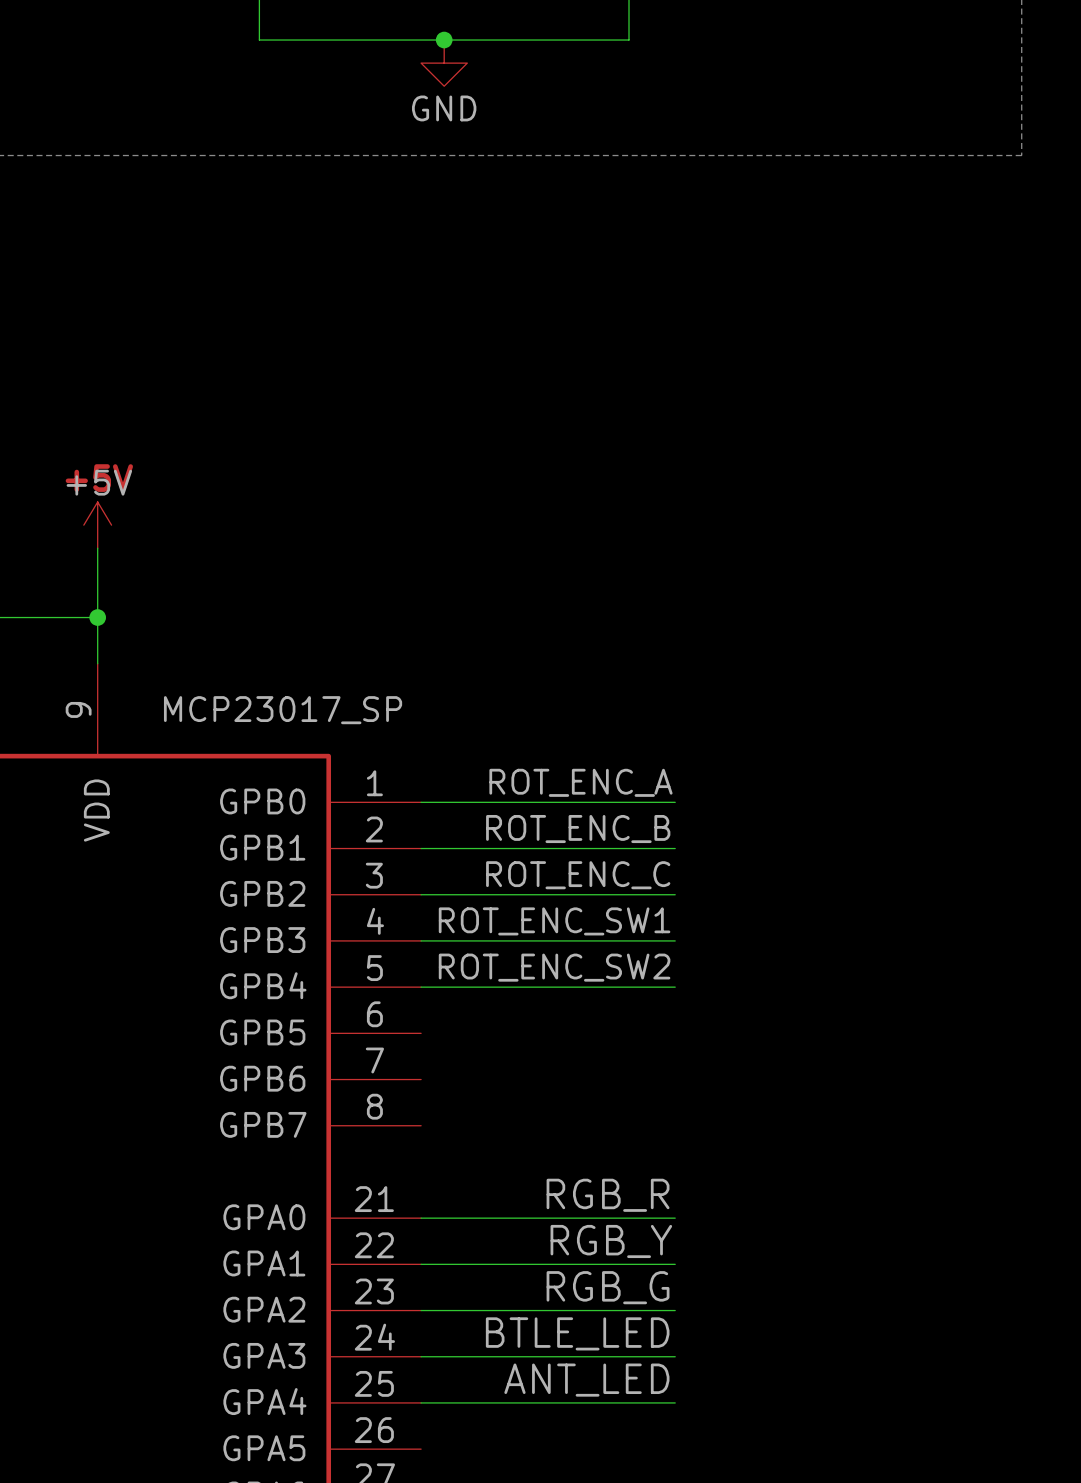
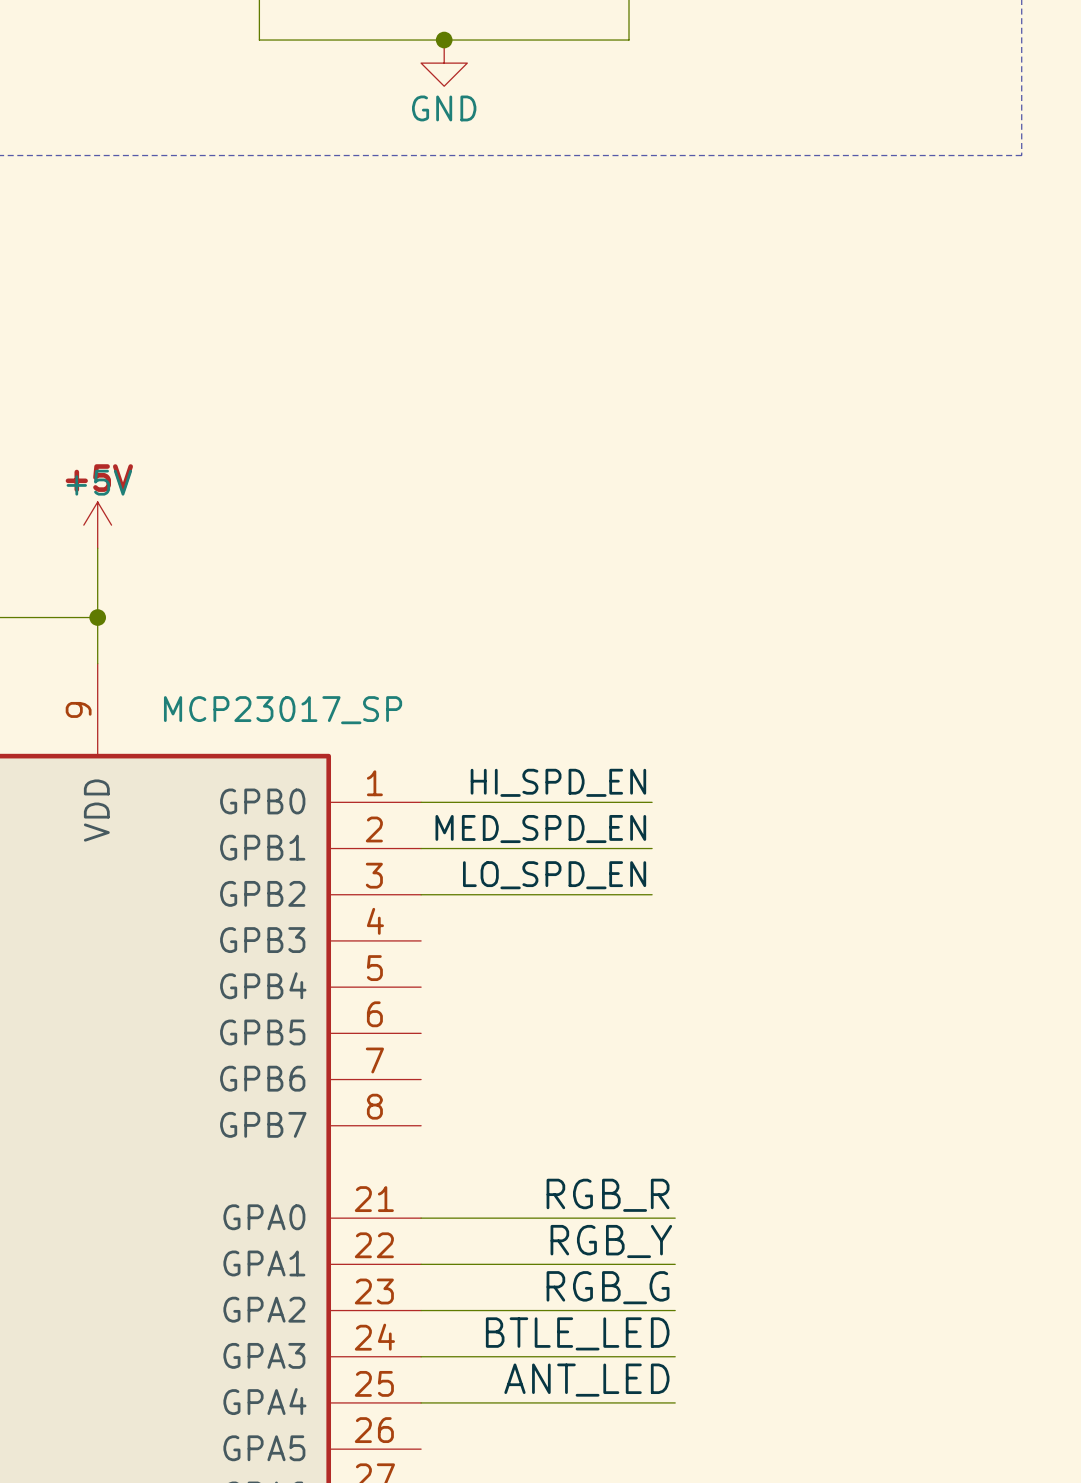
label: none -> HI_SPD_EN (558, 782)
label: ROT_ENC_A (580, 782) -> none
wire: (652, 802) (675, 802) -> none
label: none -> MED_SPD_EN (540, 829)
label: ROT_ENC_B (578, 829) -> none
wire: (652, 848) (675, 848) -> none
label: none -> LO_SPD_EN (554, 875)
label: ROT_ENC_C (578, 875) -> none
wire: (652, 894) (675, 894) -> none
label: ROT_ENC_SW1 (554, 921) -> none
wire: (421, 940) (675, 940) -> none
label: ROT_ENC_SW2 (554, 967) -> none
wire: (421, 987) (675, 987) -> none

